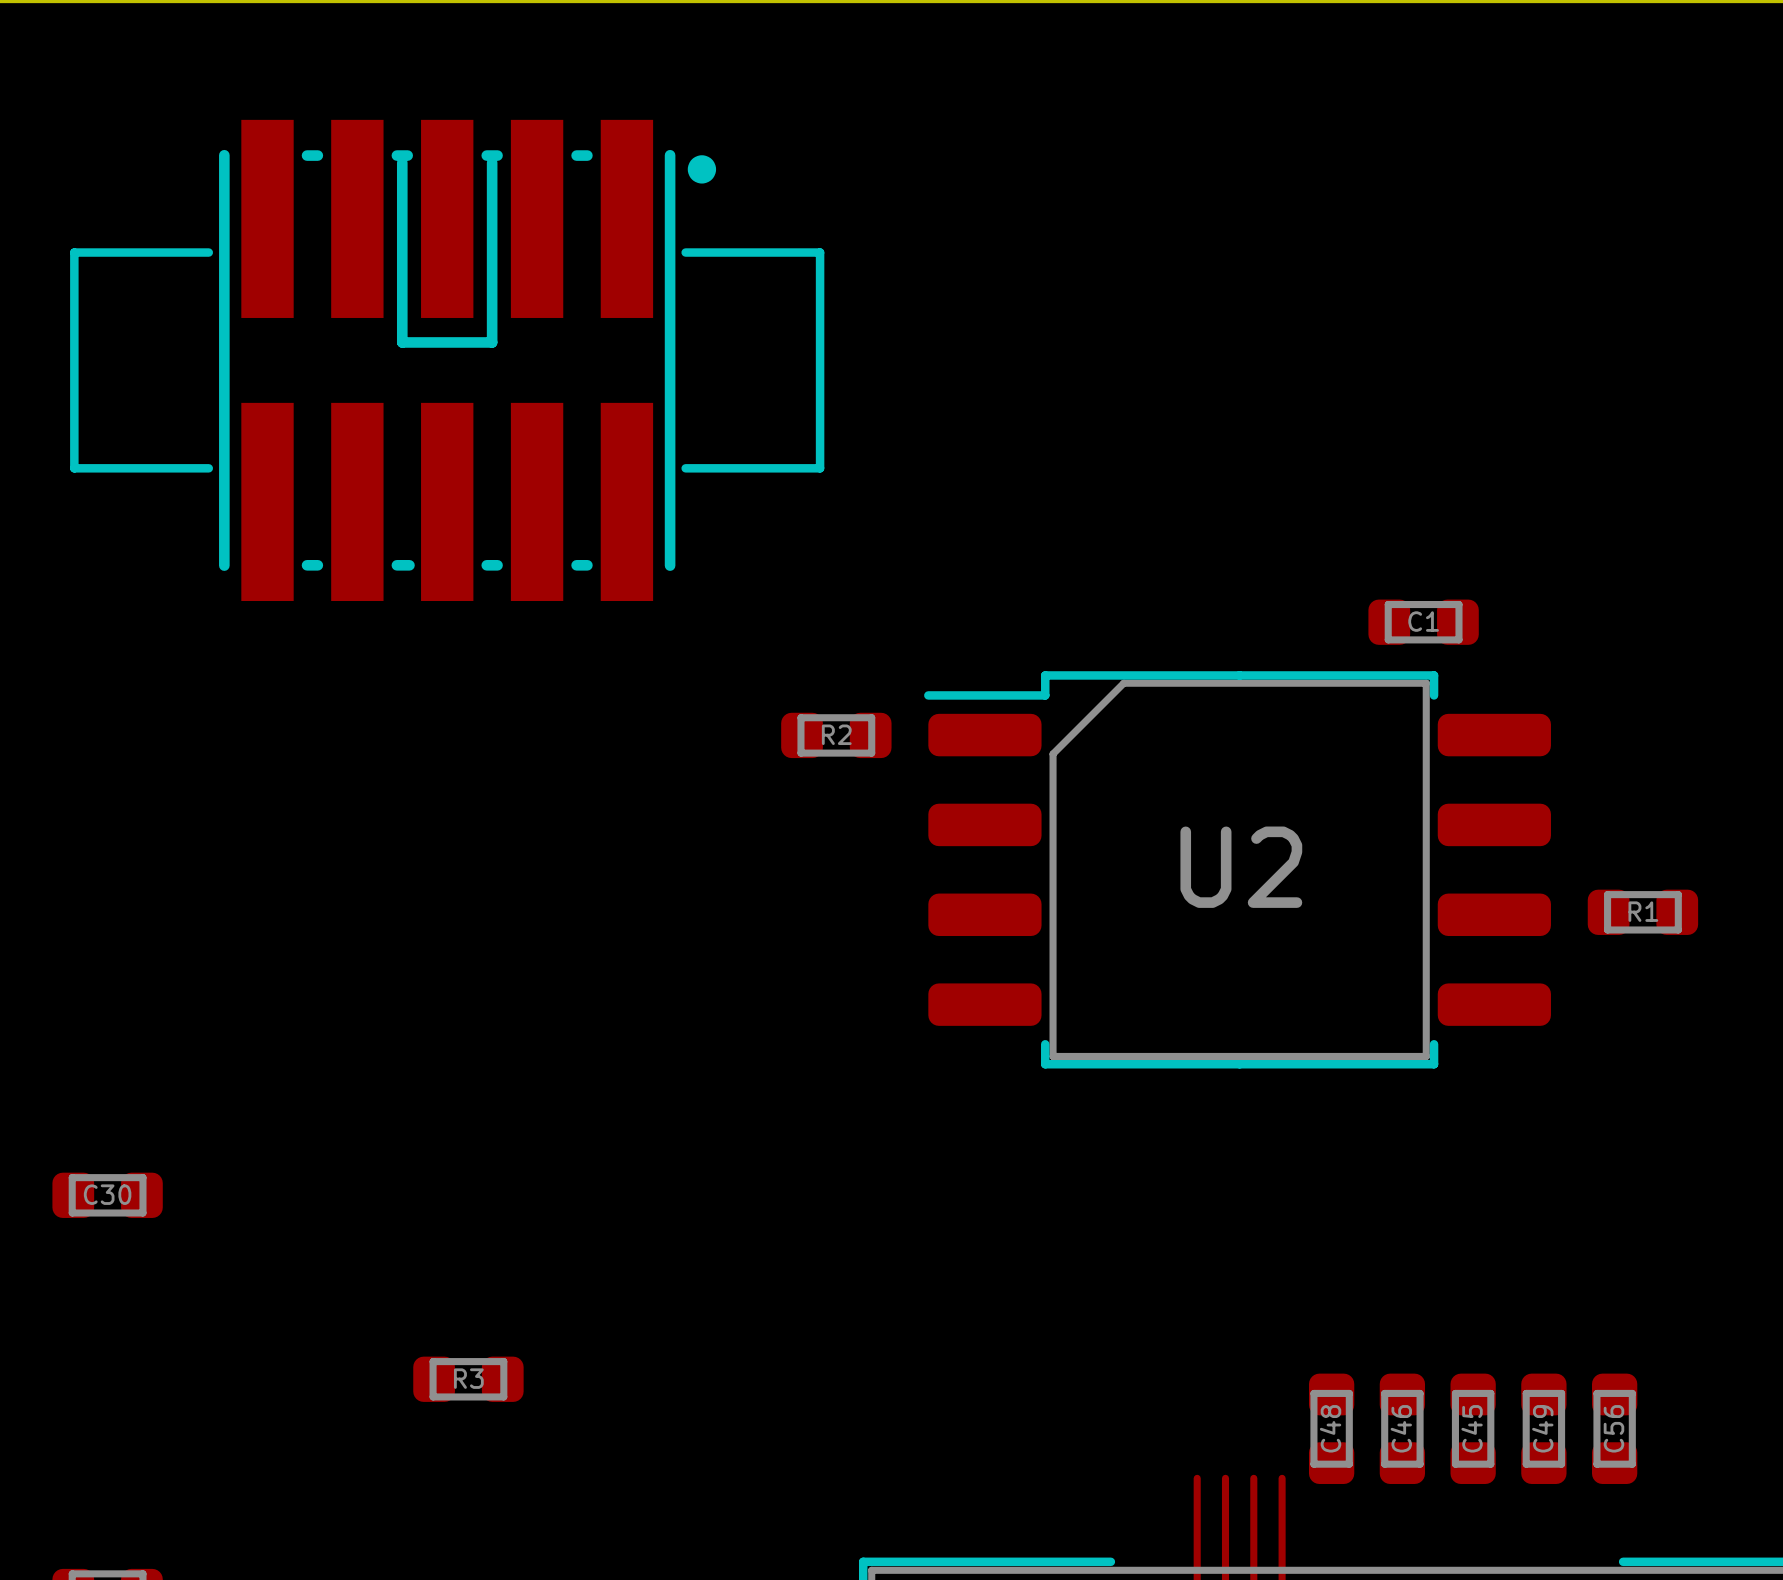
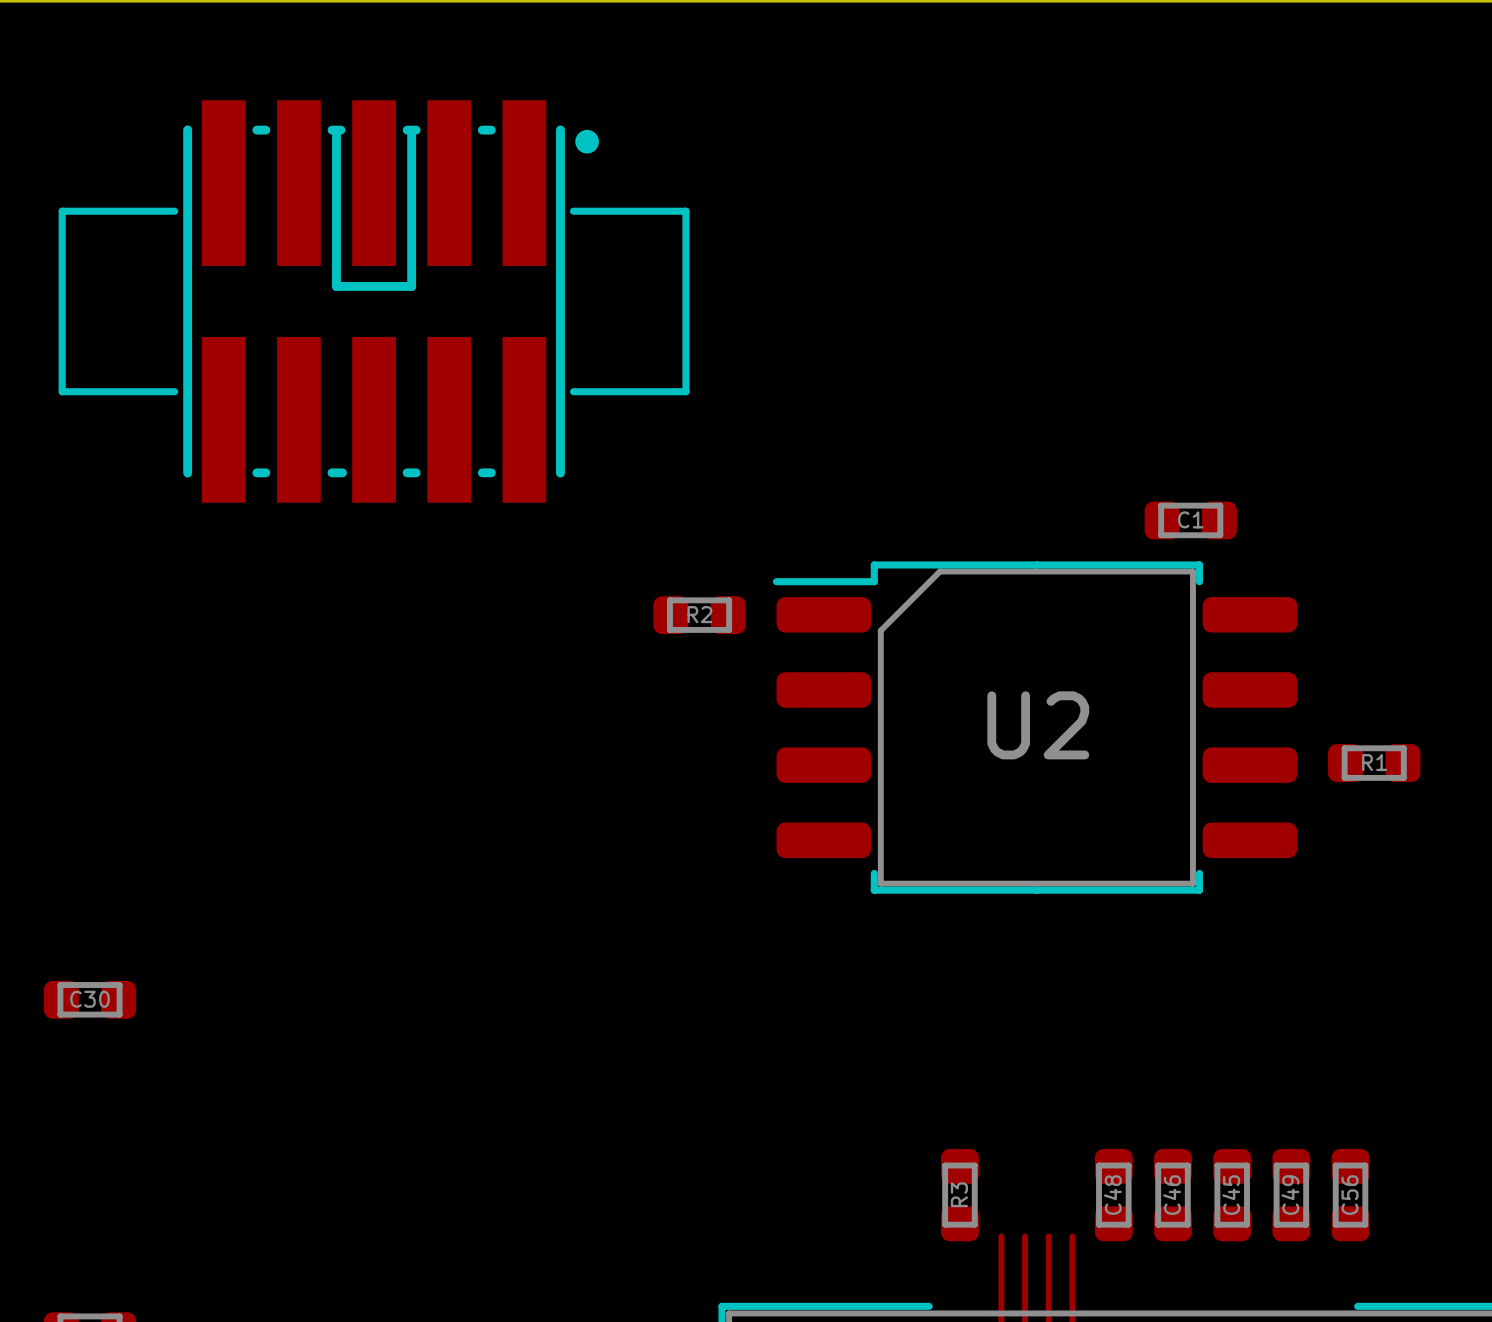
R3 rotation: 0° (468, 1379) -> 90° clockwise (959, 1195)
R3 position: (468, 1379) -> (959, 1195)

